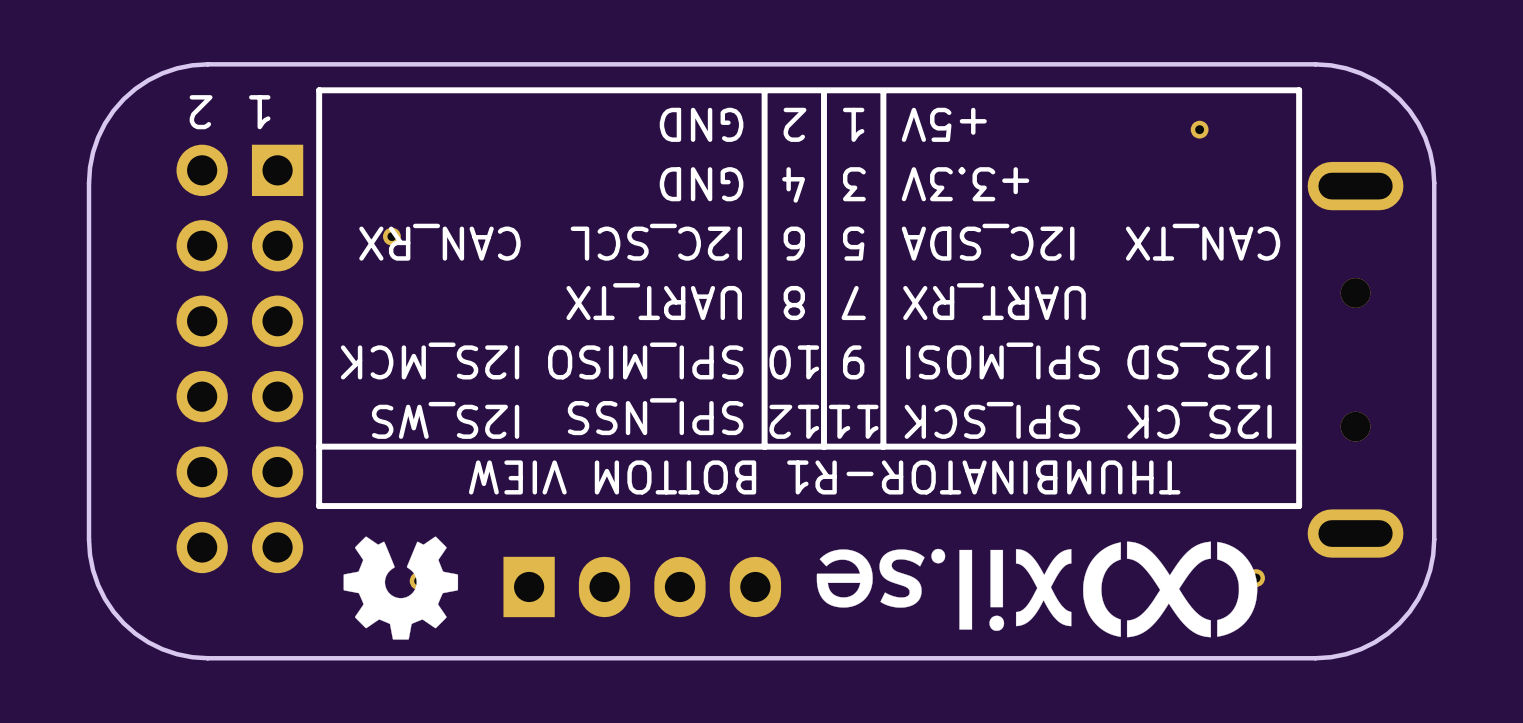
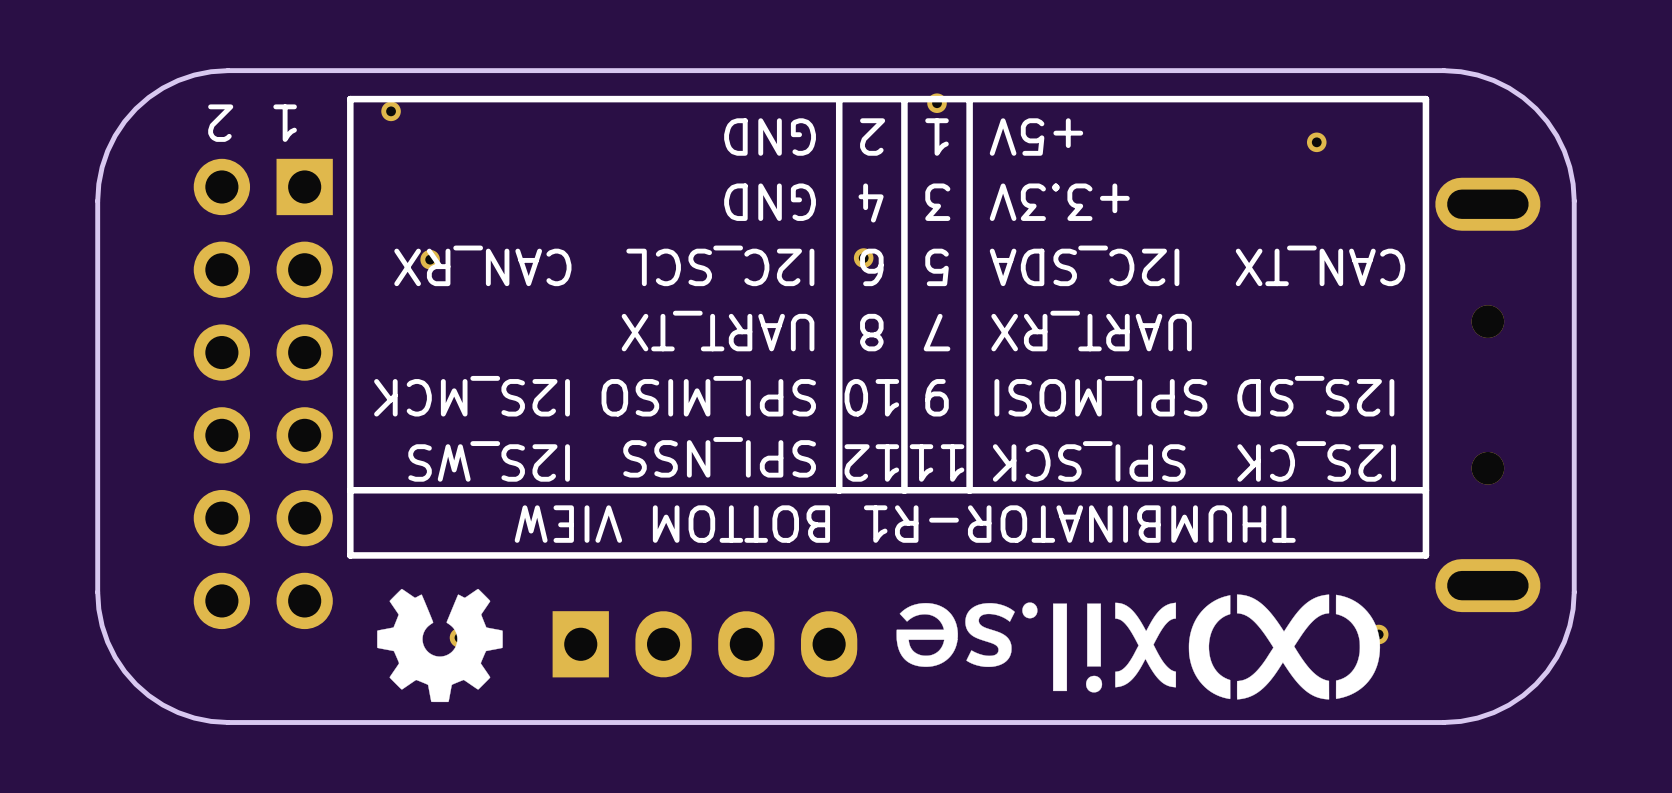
part: none -> (937, 103)
part: none -> (391, 111)
part: none -> (863, 258)

